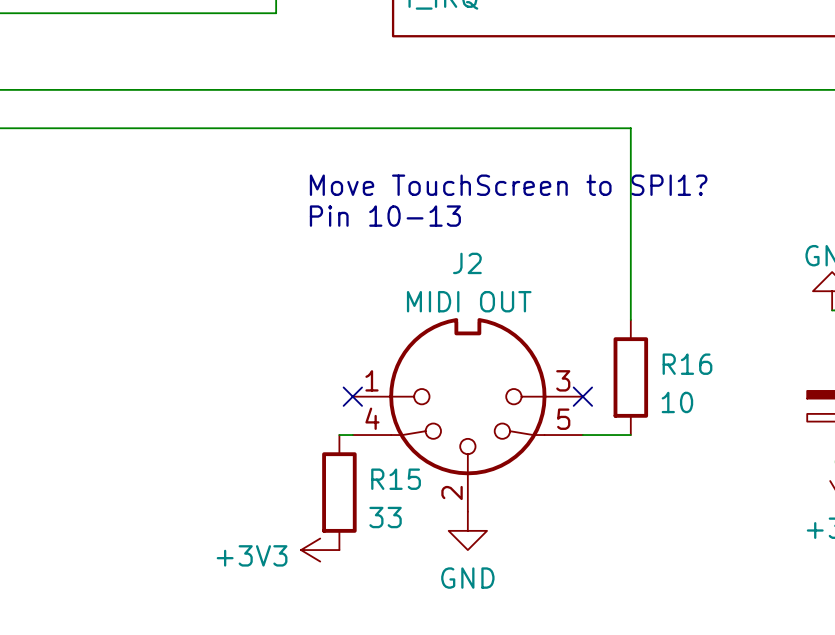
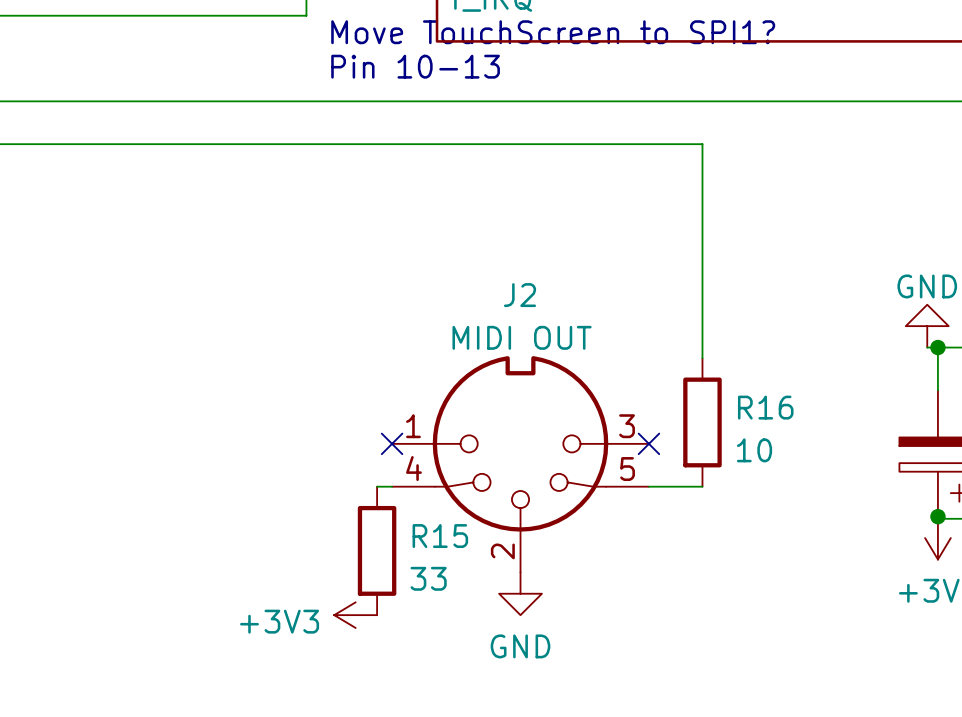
text position: Move TouchScreen to SPI1? (508, 185) -> Move TouchScreen to SPI1? (553, 32)
text position: Pin 10-13 (385, 216) -> Pin 10-13 (415, 66)

